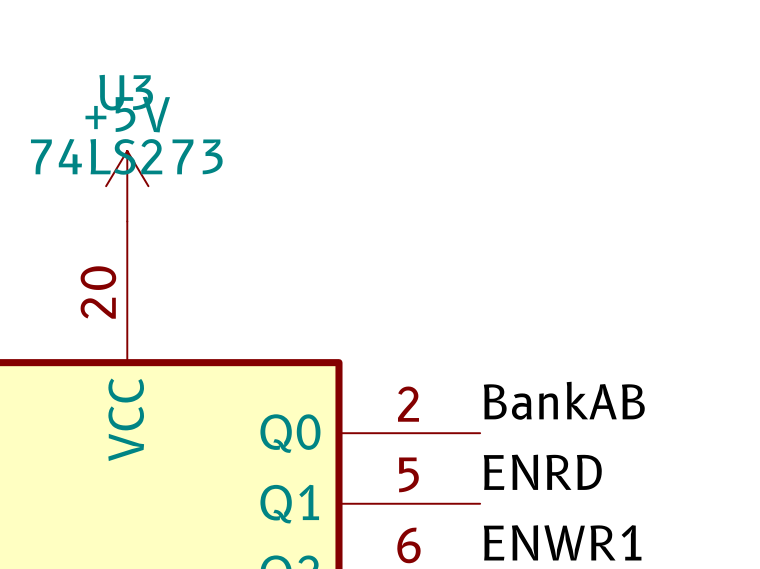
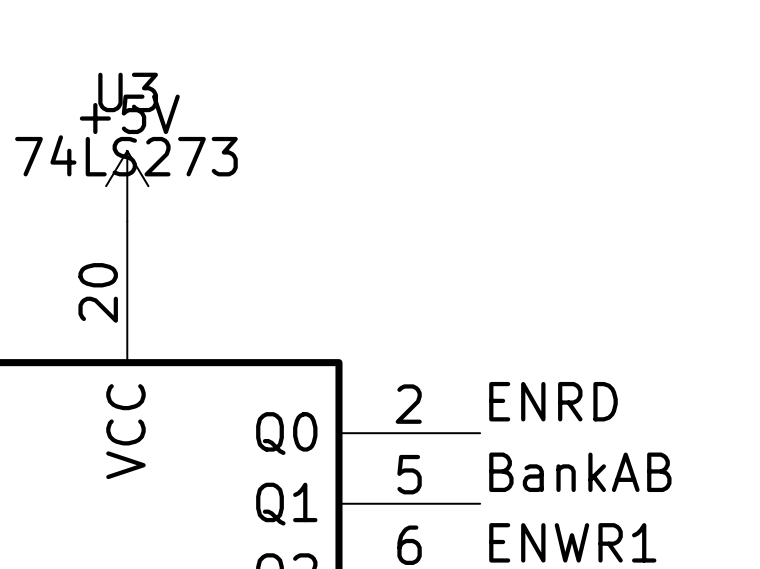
label: BankAB (564, 400) -> ENRD (553, 401)
label: ENRD (542, 472) -> BankAB (580, 472)

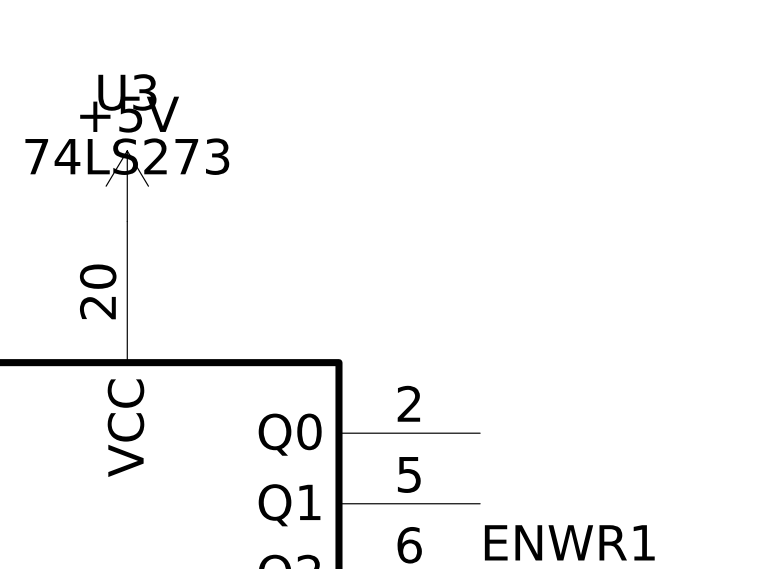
label: ENRD (553, 401) -> none
label: BankAB (580, 472) -> none

